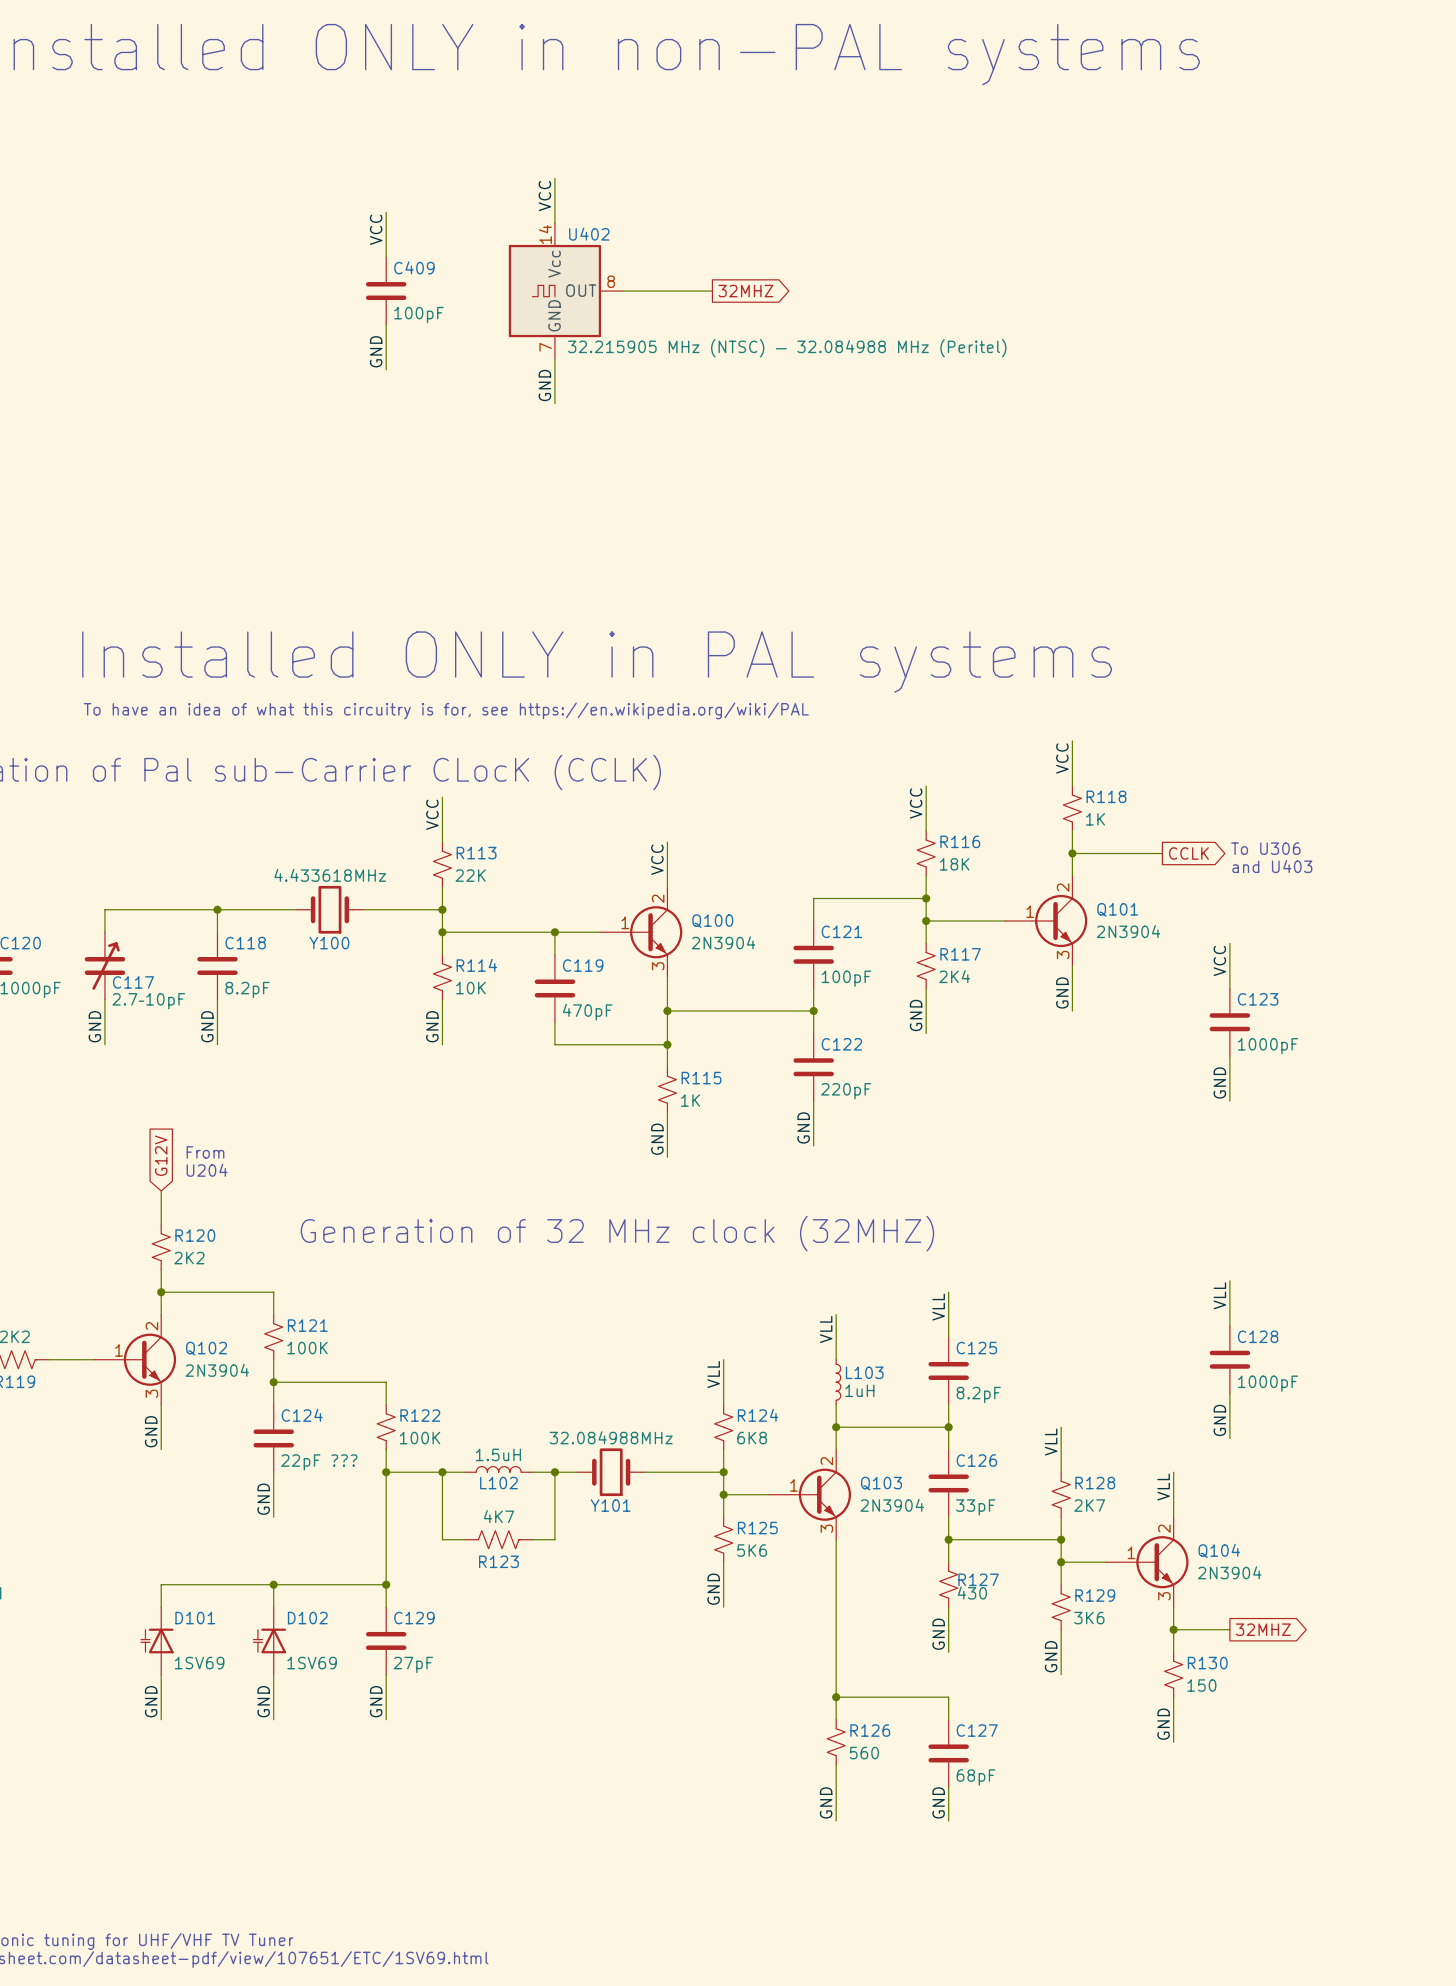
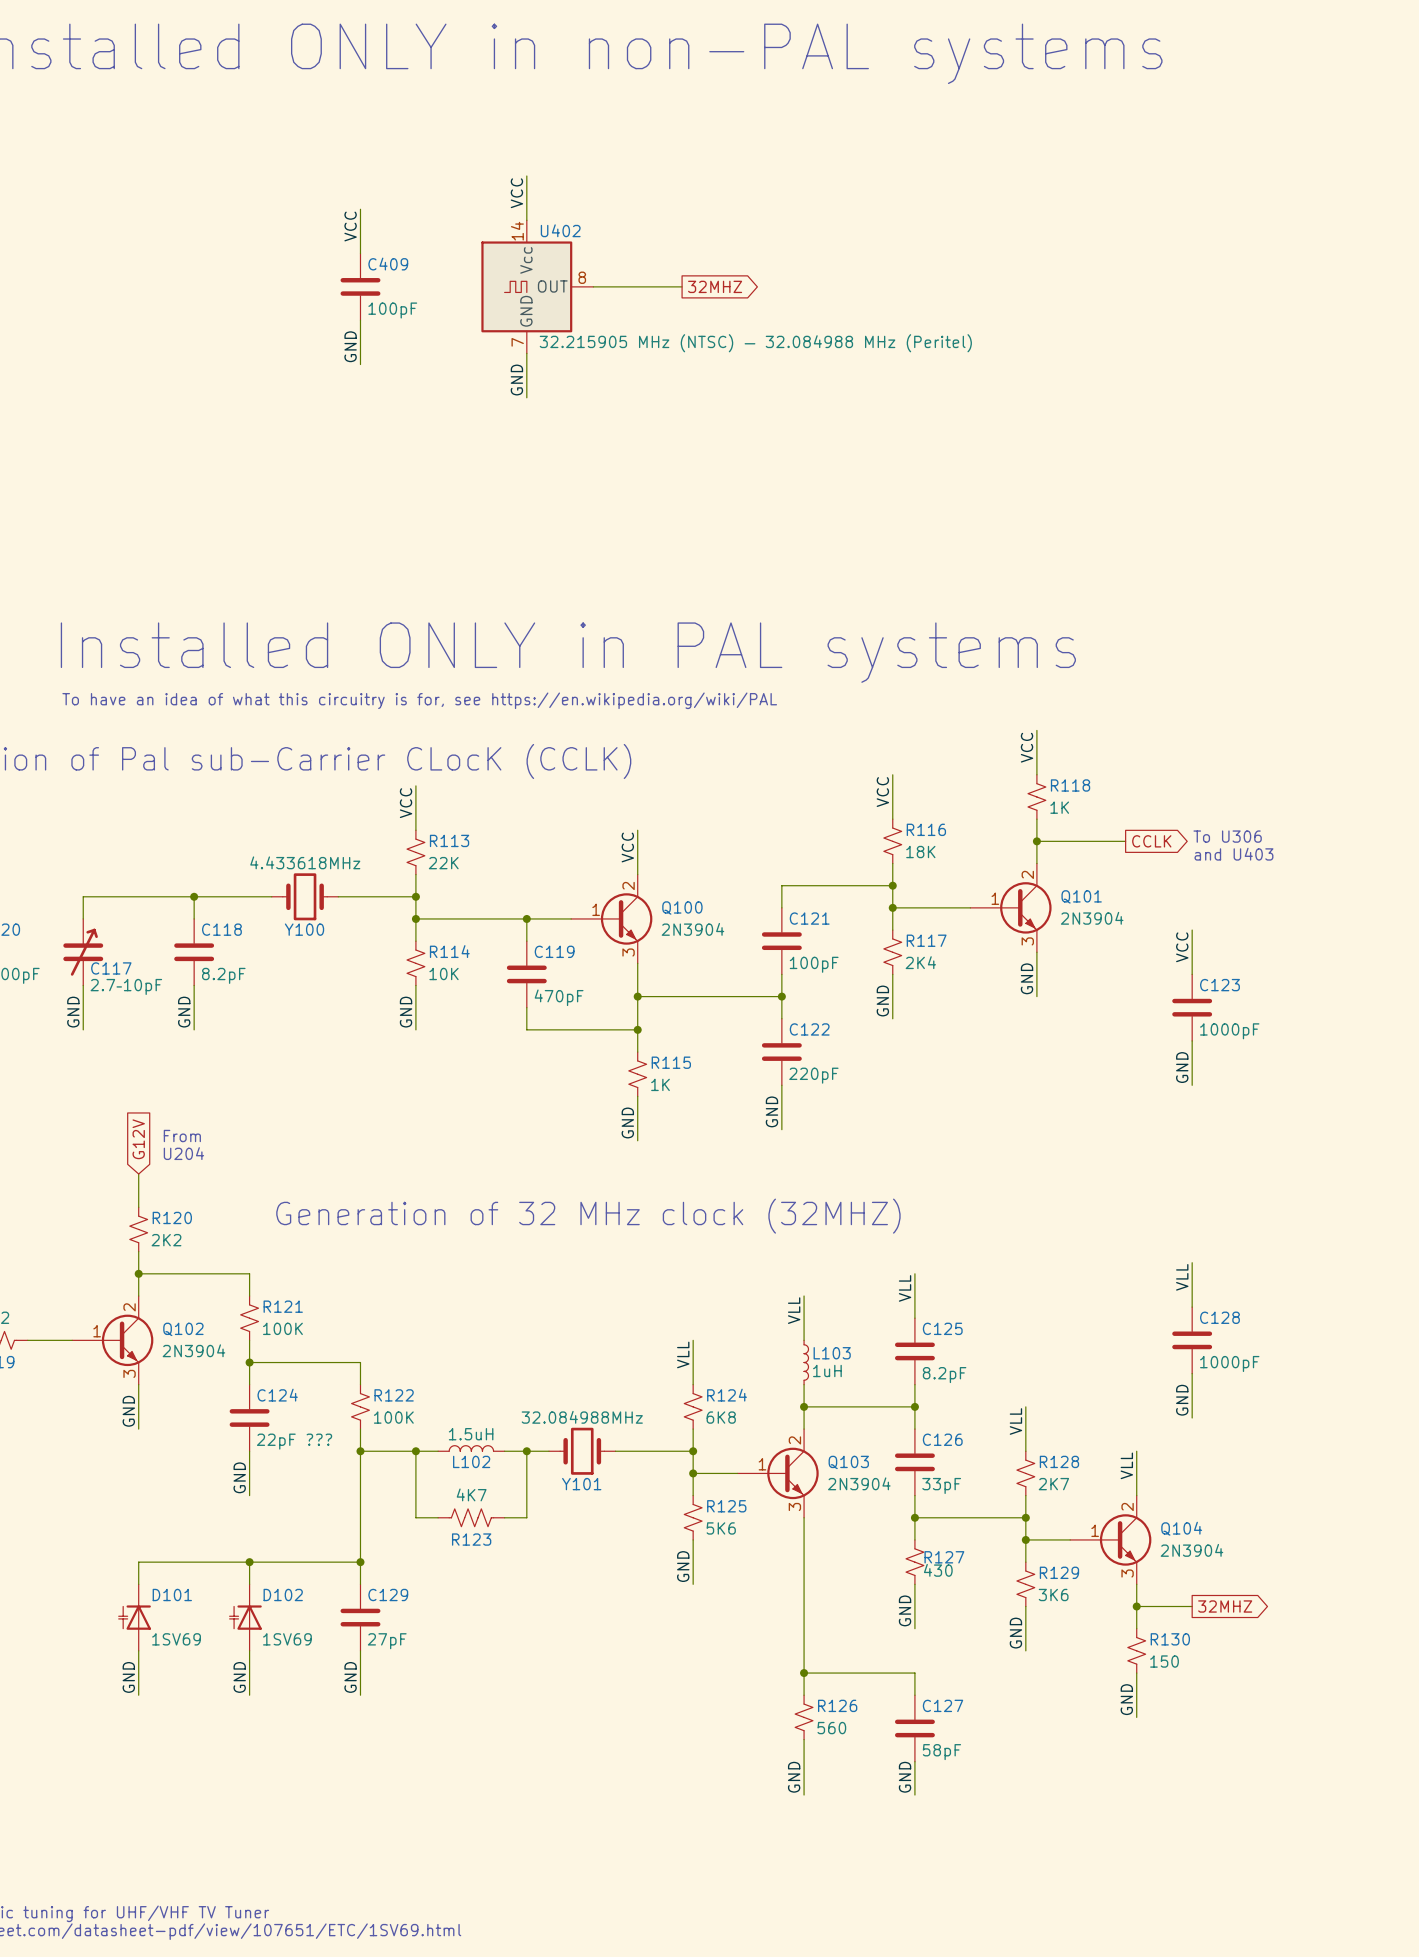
C127 value: 68pF (976, 1777) -> 58pF (941, 1752)

